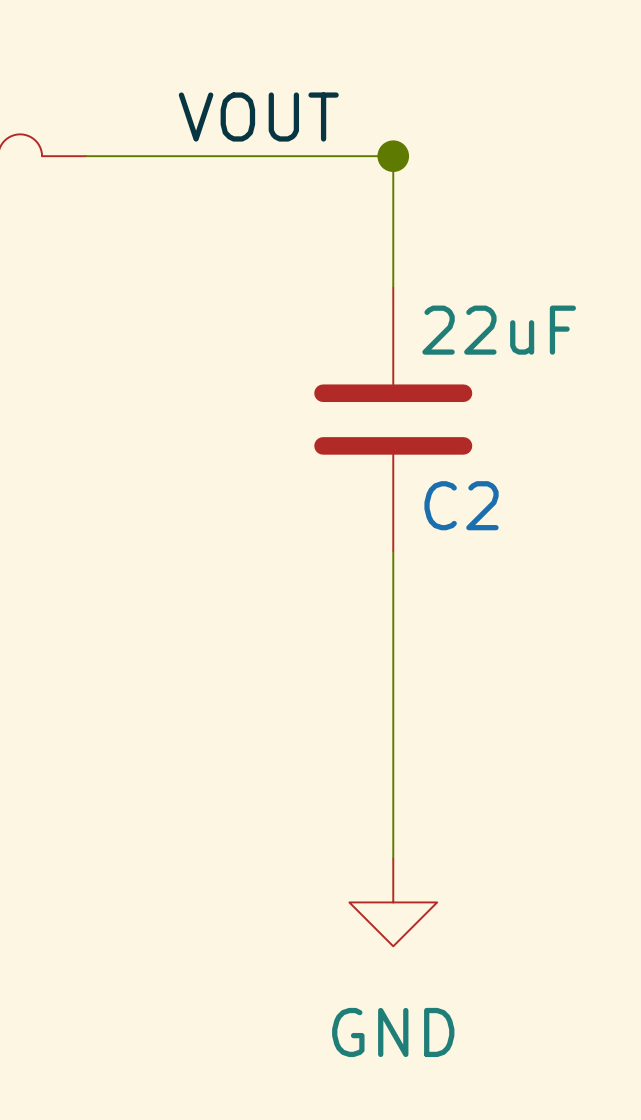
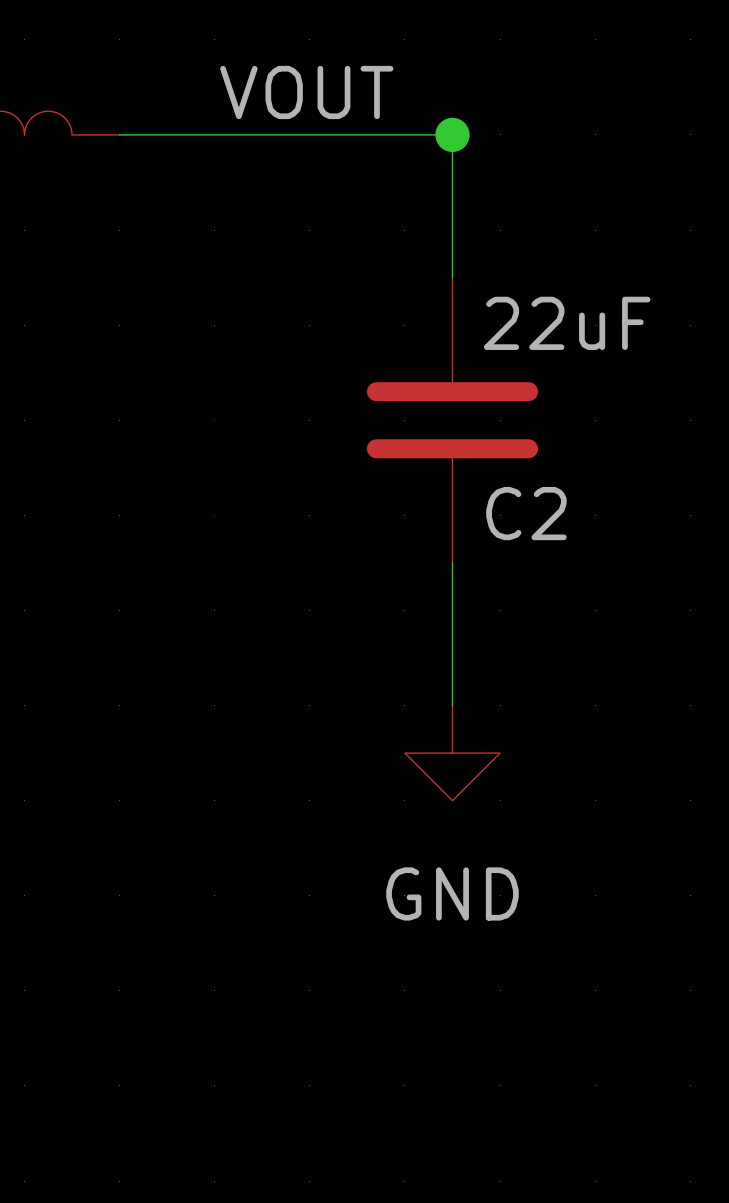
wire: (393, 682) (393, 858) -> none
power symbol position: GND (393, 902) -> GND (452, 753)

